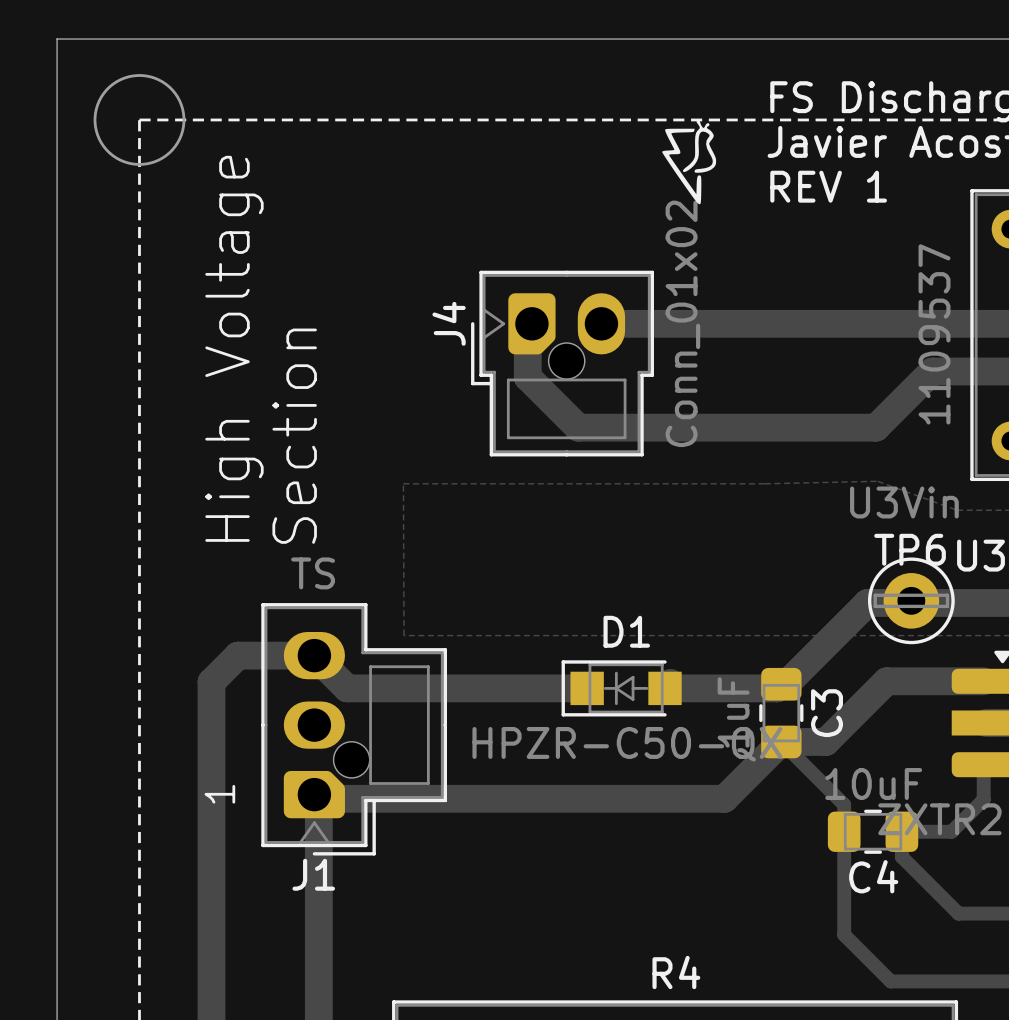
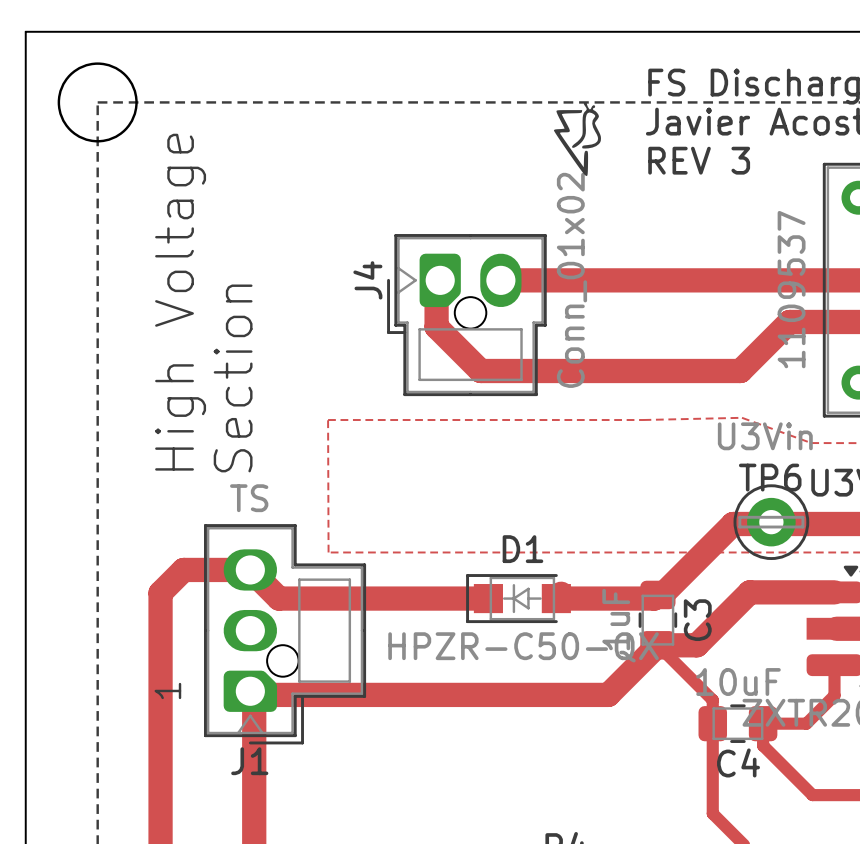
text: REV 1 (828, 186) -> REV 3 (699, 160)

